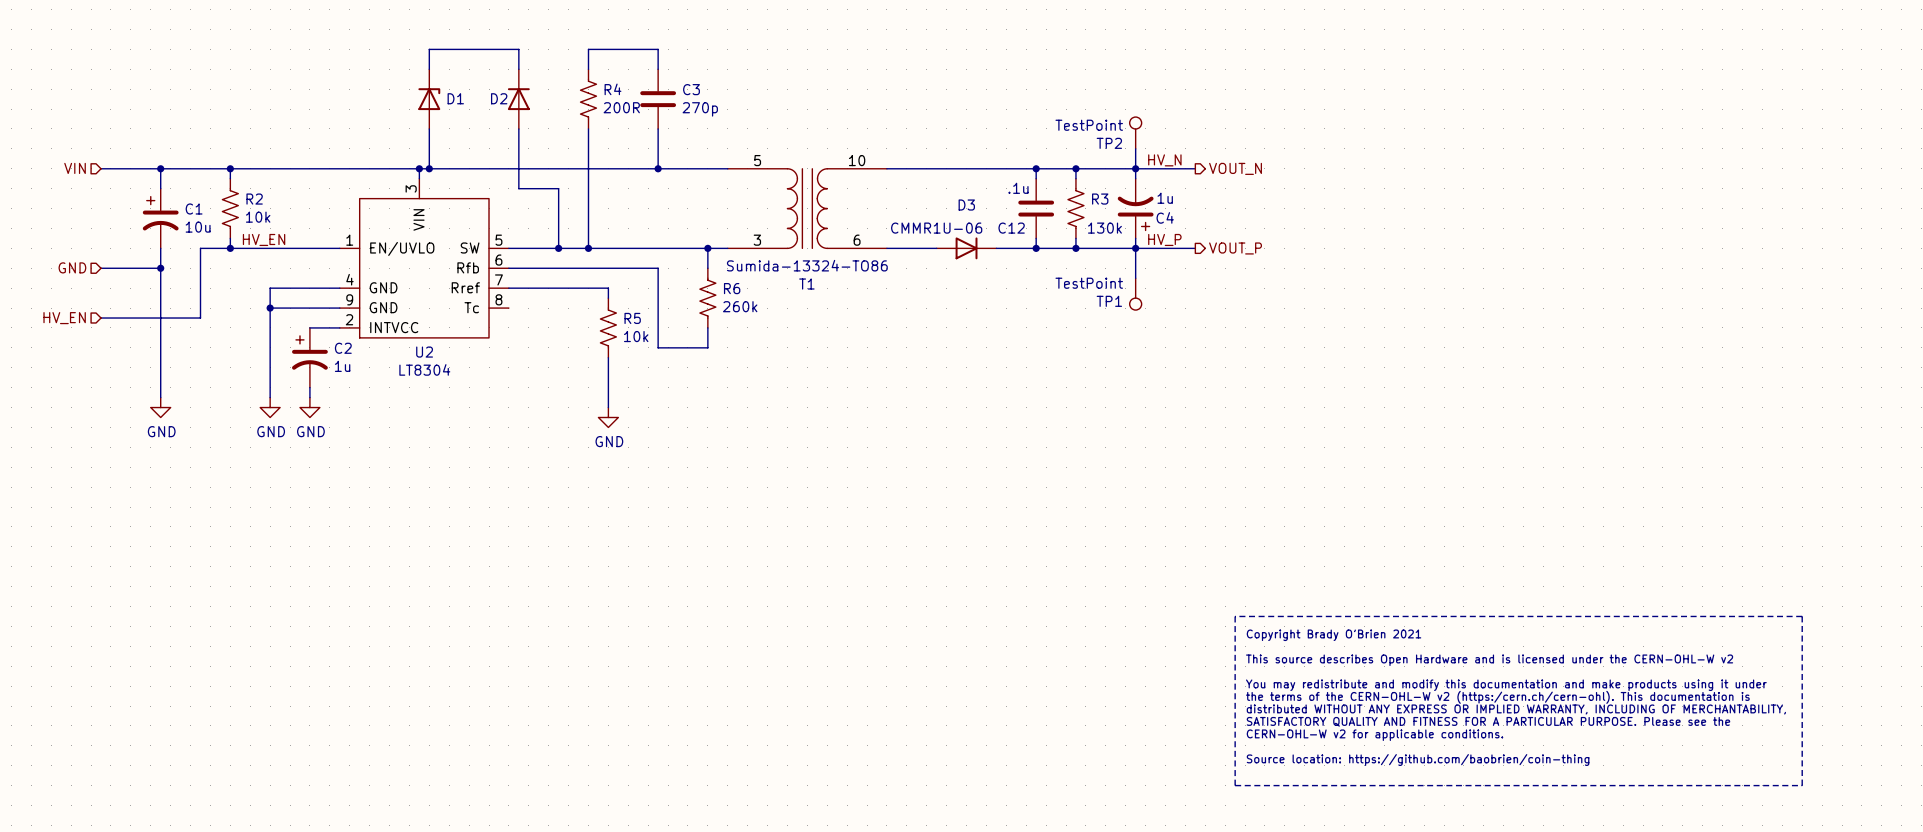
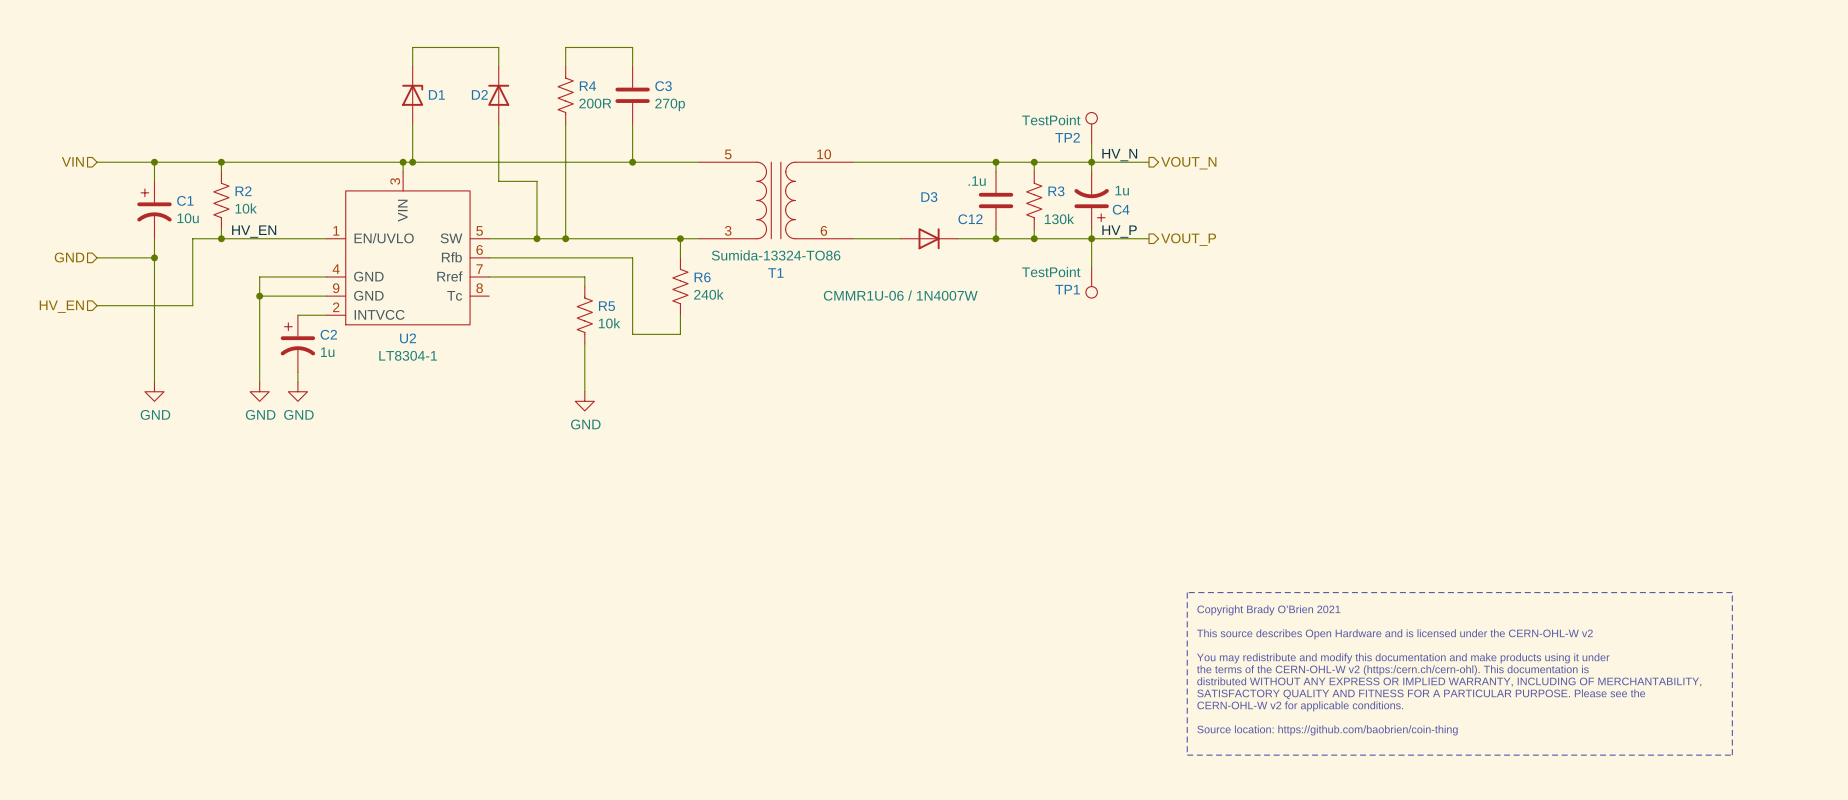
D3 value: CMMR1U-06 (936, 228) -> CMMR1U-06 / 1N4007W (900, 295)
R6 value: 260k (740, 306) -> 240k (708, 294)
U2 value: LT8304 (424, 369) -> LT8304-1 (408, 355)

